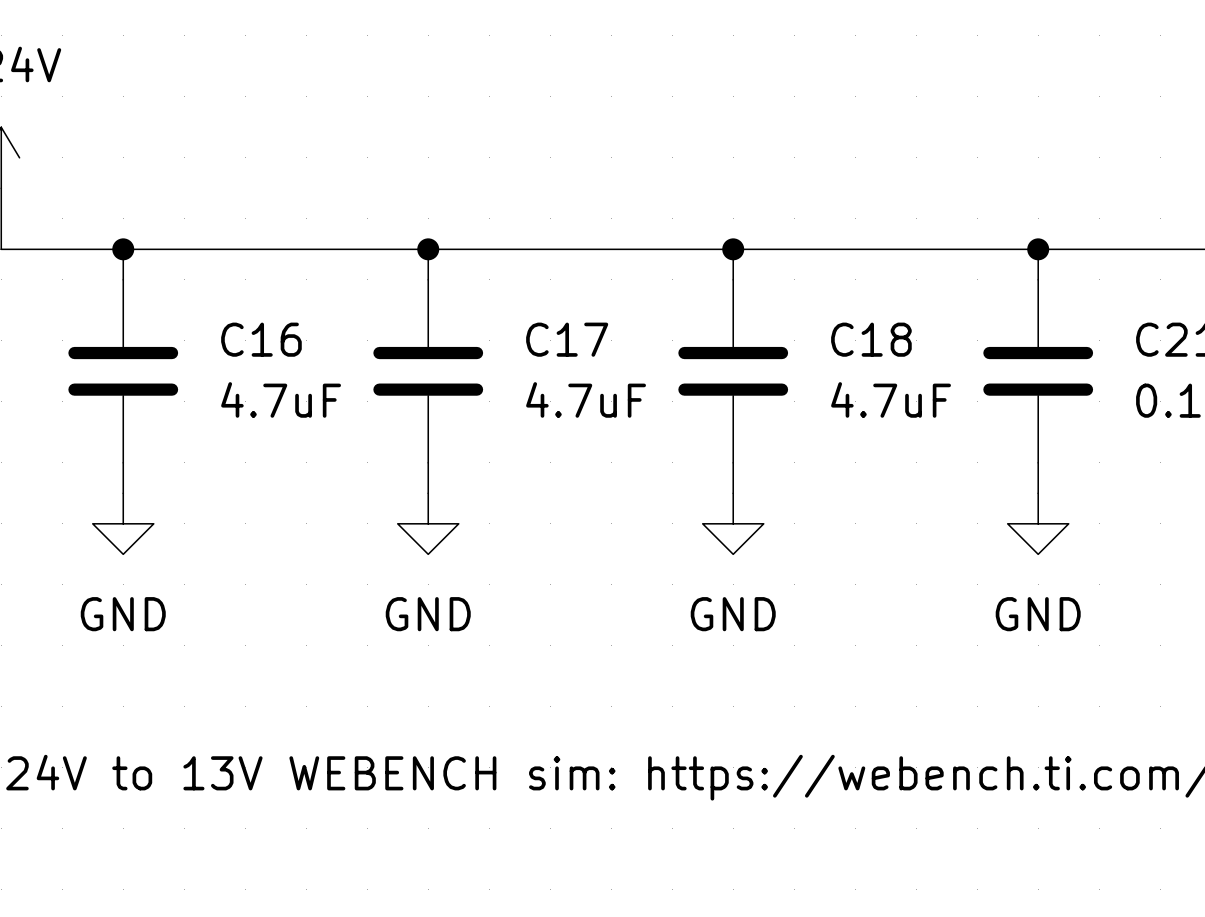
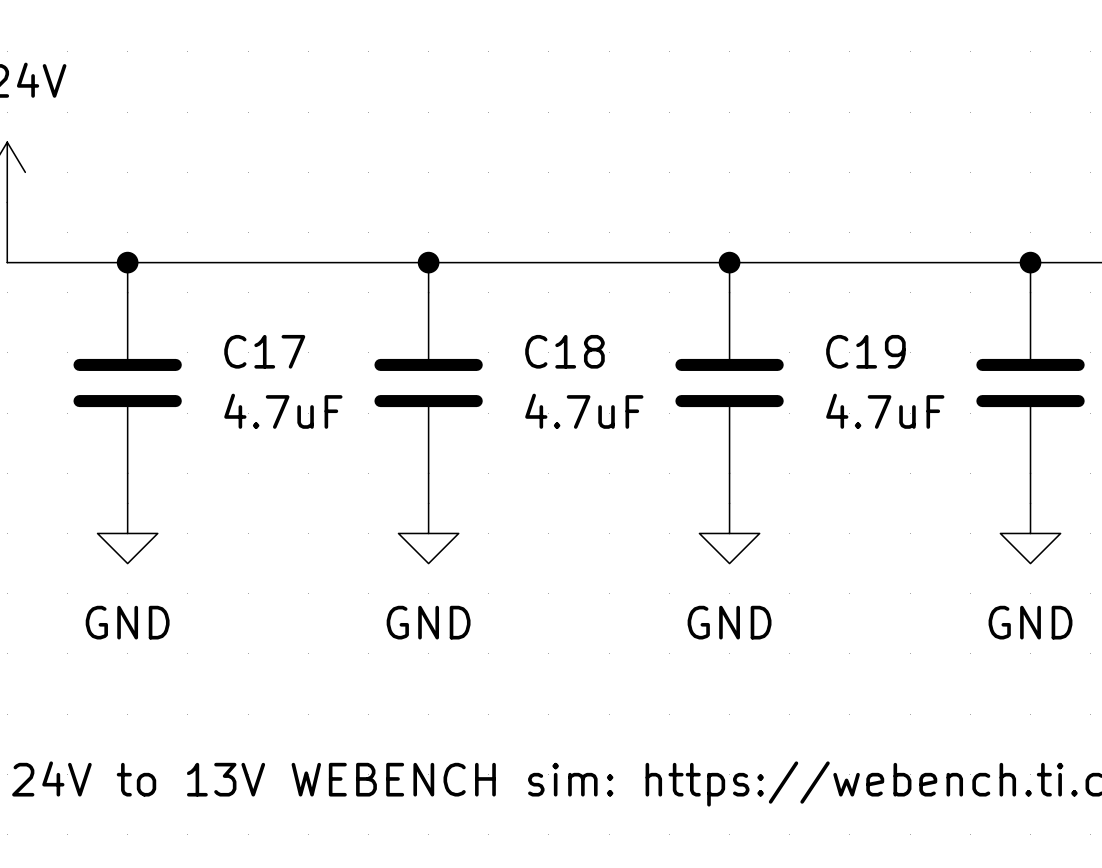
C16 name: C16 (261, 339) -> C17 (264, 351)
C17 name: C17 (567, 339) -> C18 (564, 351)
C18 name: C18 (871, 339) -> C19 (865, 351)

